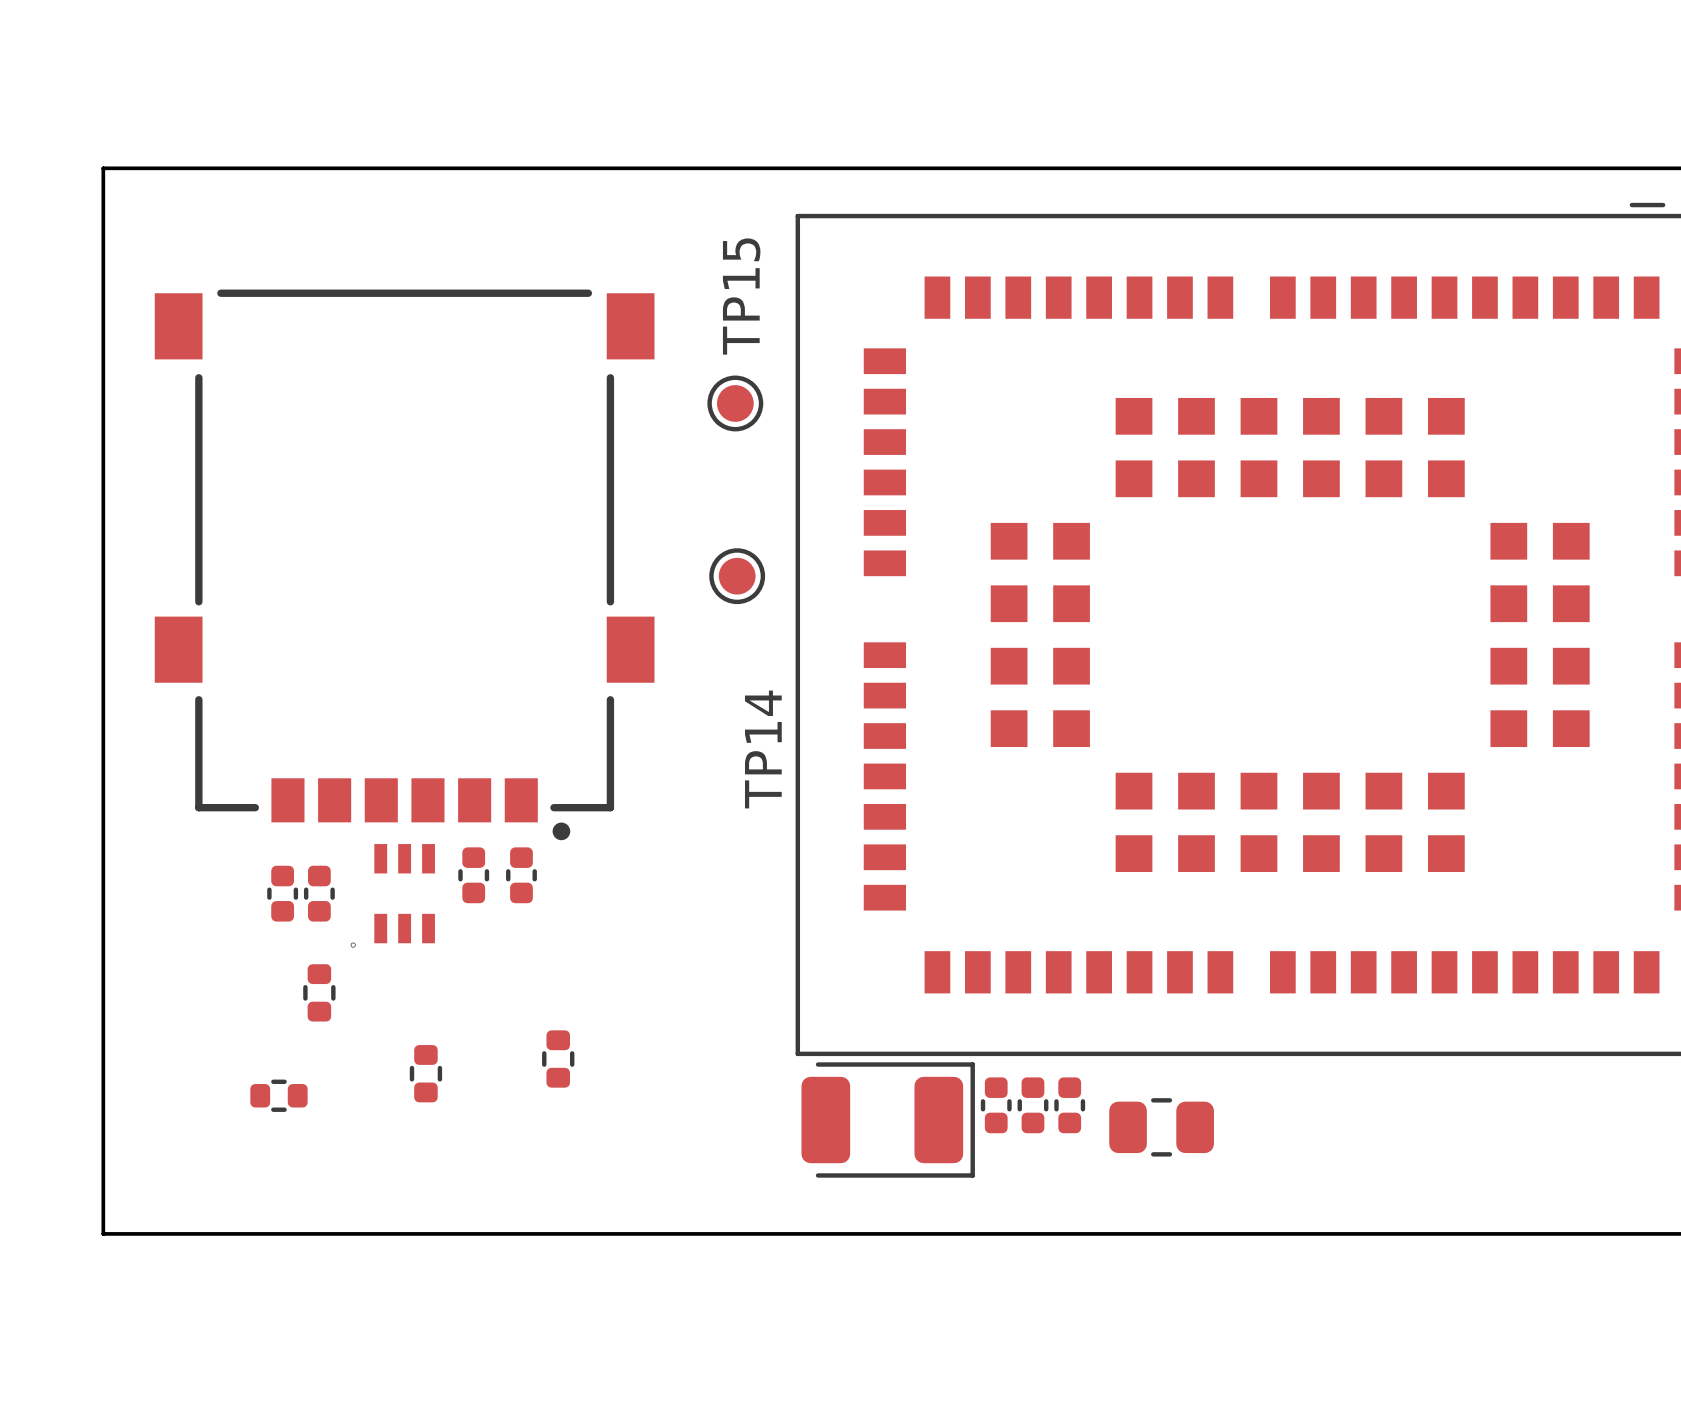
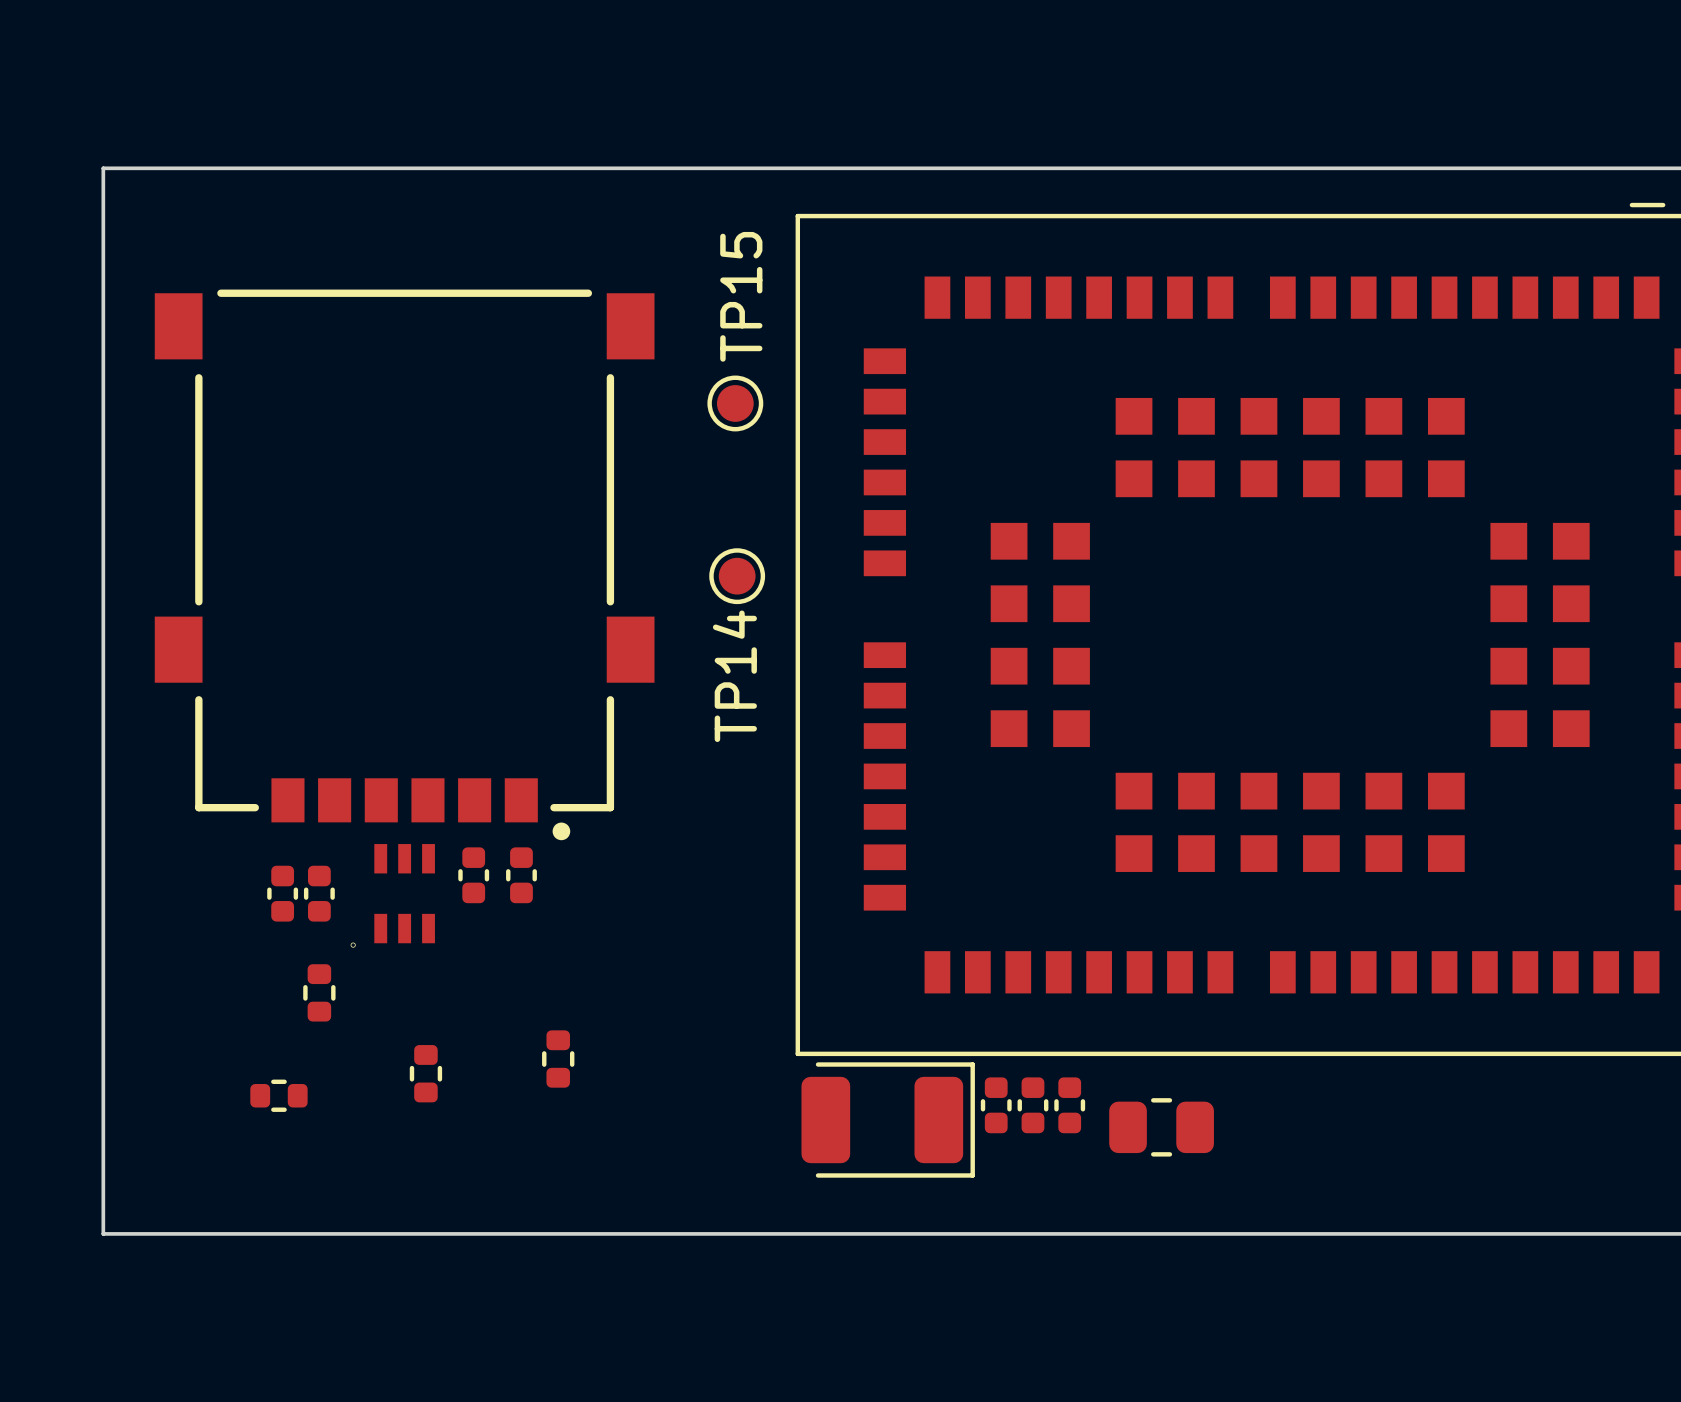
TP14 name position: TP14 (763, 749) -> TP14 (734, 676)

